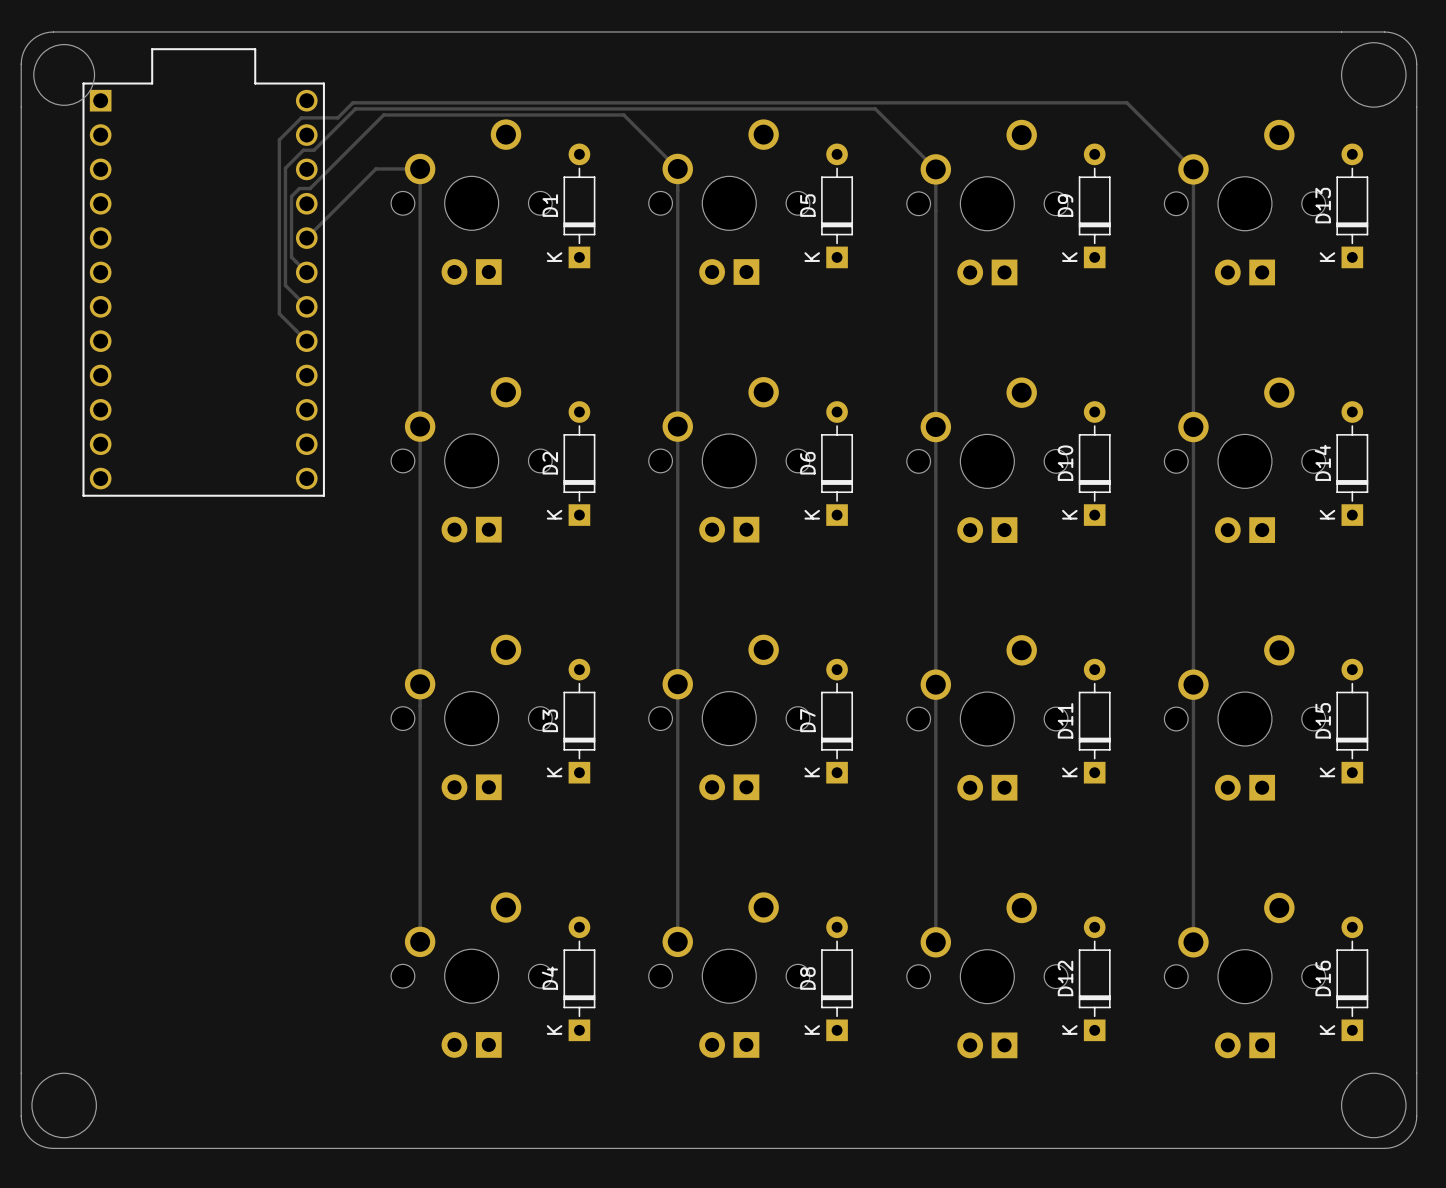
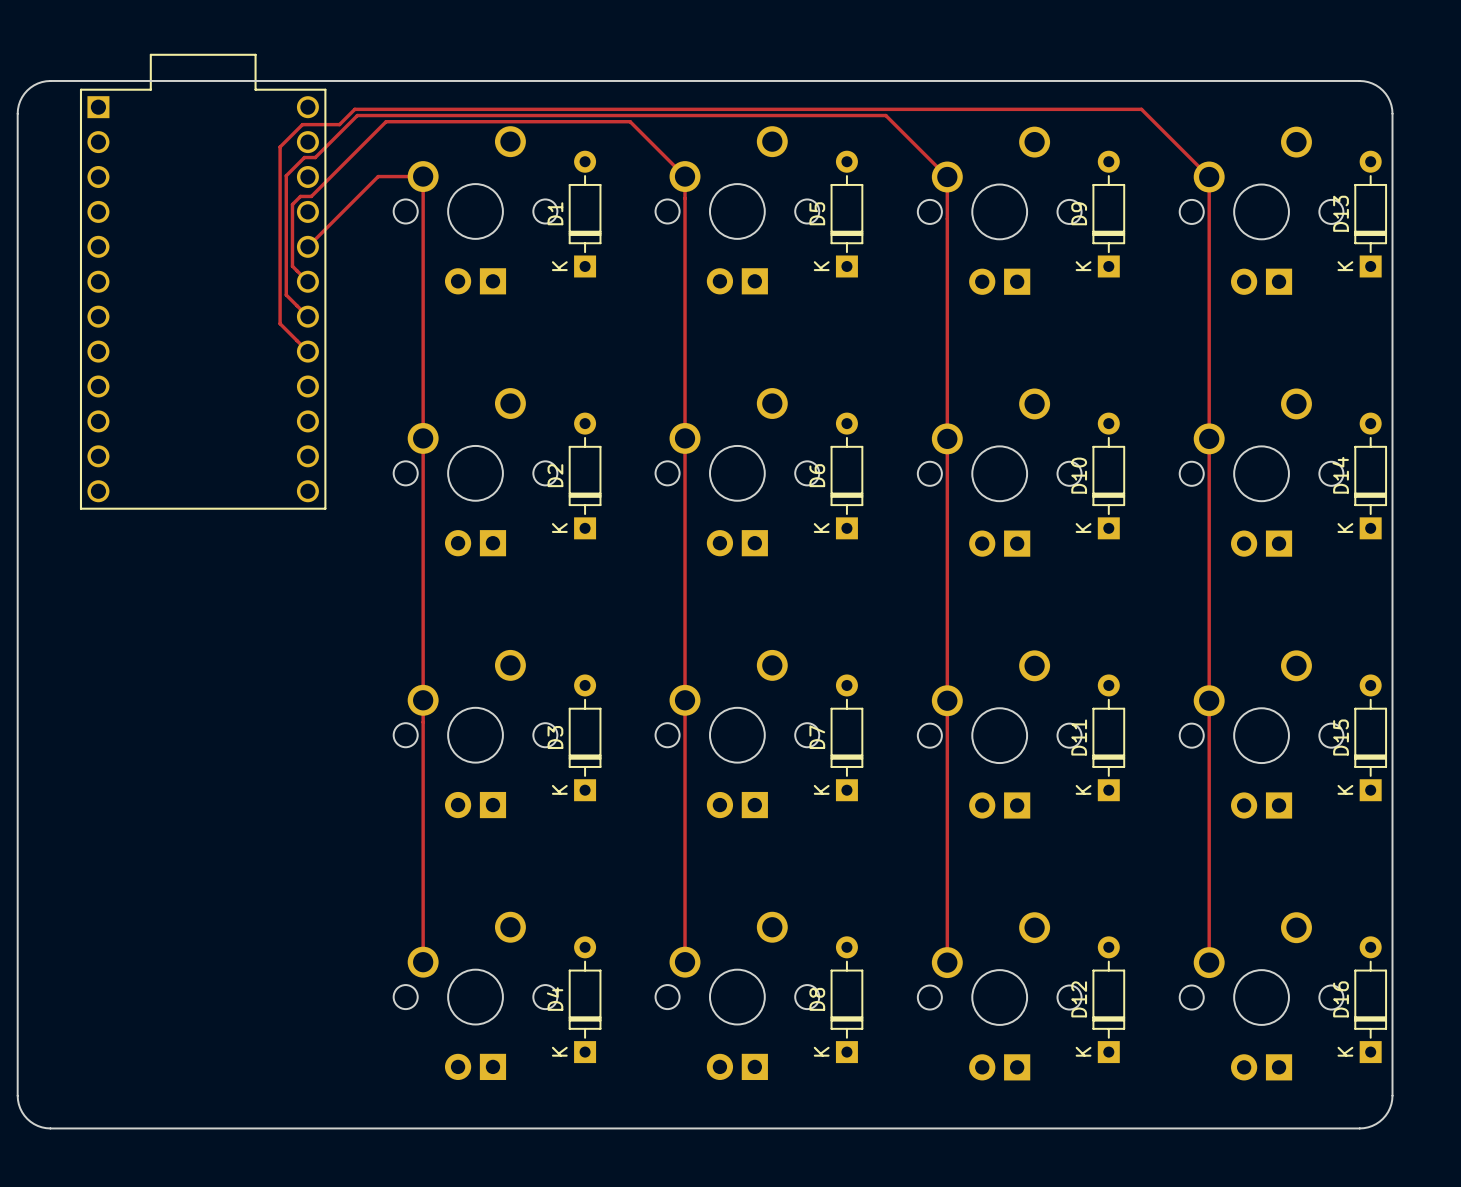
round board edge: [1341, 42, 1407, 108] -> none
round board edge: [33, 44, 95, 106] -> none
board edge: (21, 107) (21, 64) (23, 51) (27, 44) (37, 36) (53, 31) (1384, 31) (1396, 34) (1407, 41) (1414, 51) (1416, 64) (1416, 1116) (1412, 1132) (1404, 1141) (1392, 1147) (1384, 1148) (53, 1148) (45, 1147) (33, 1141) (23, 1128) (21, 1116) (21, 1073) -> (17, 113) (20, 101) (27, 90) (37, 83) (50, 80) (1359, 80) (1372, 83) (1382, 90) (1390, 101) (1392, 113) (1392, 1095) (1388, 1112) (1379, 1121) (1368, 1127) (1359, 1128) (50, 1128) (37, 1125) (27, 1118) (20, 1108) (17, 1095)
round board edge: [31, 1072, 97, 1139] -> none
round board edge: [1341, 1072, 1407, 1139] -> none

